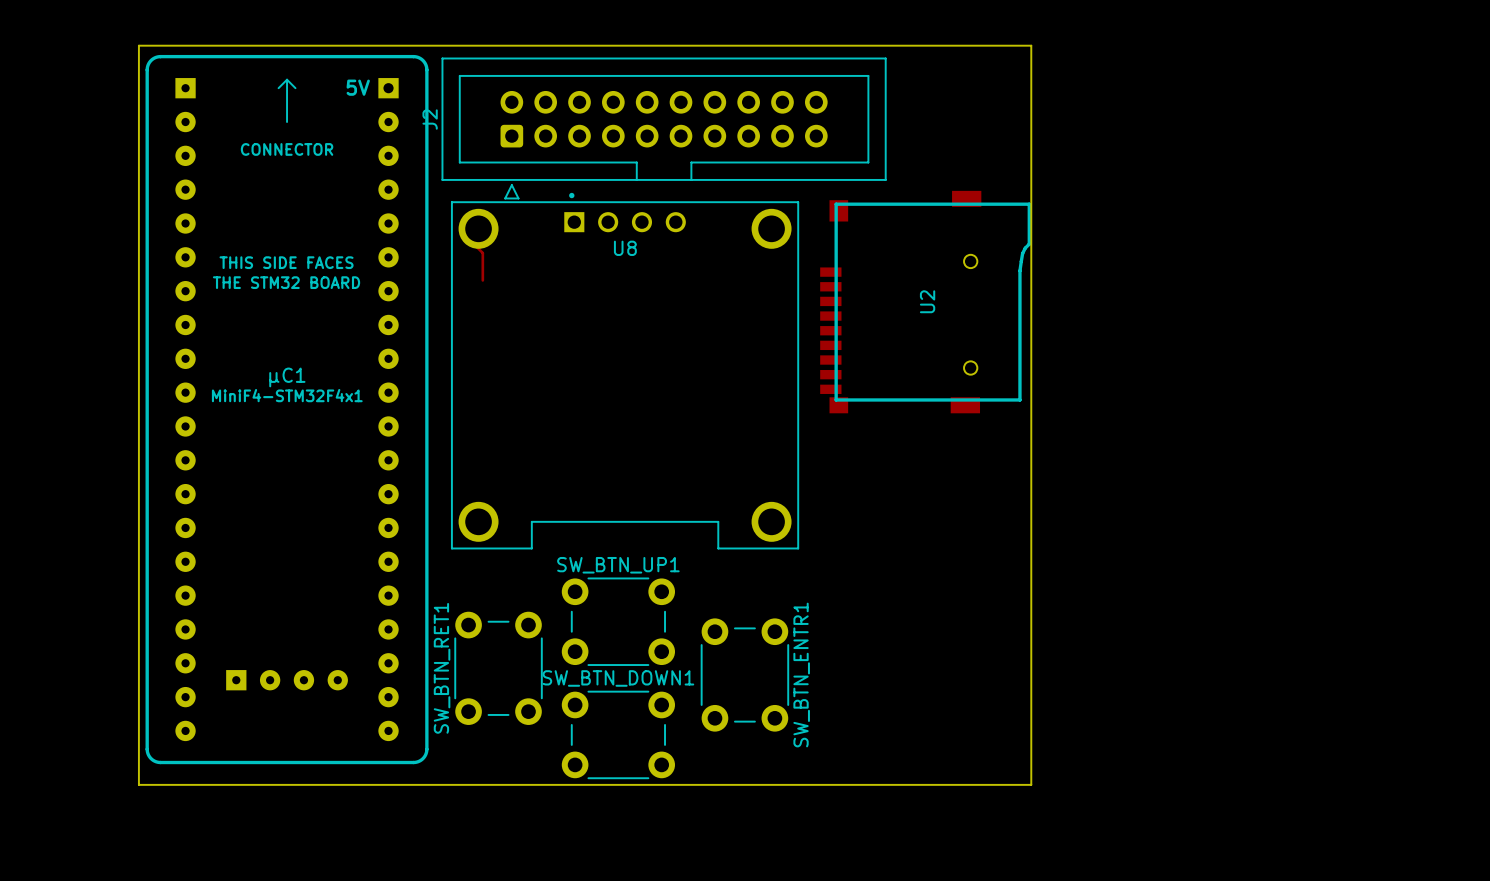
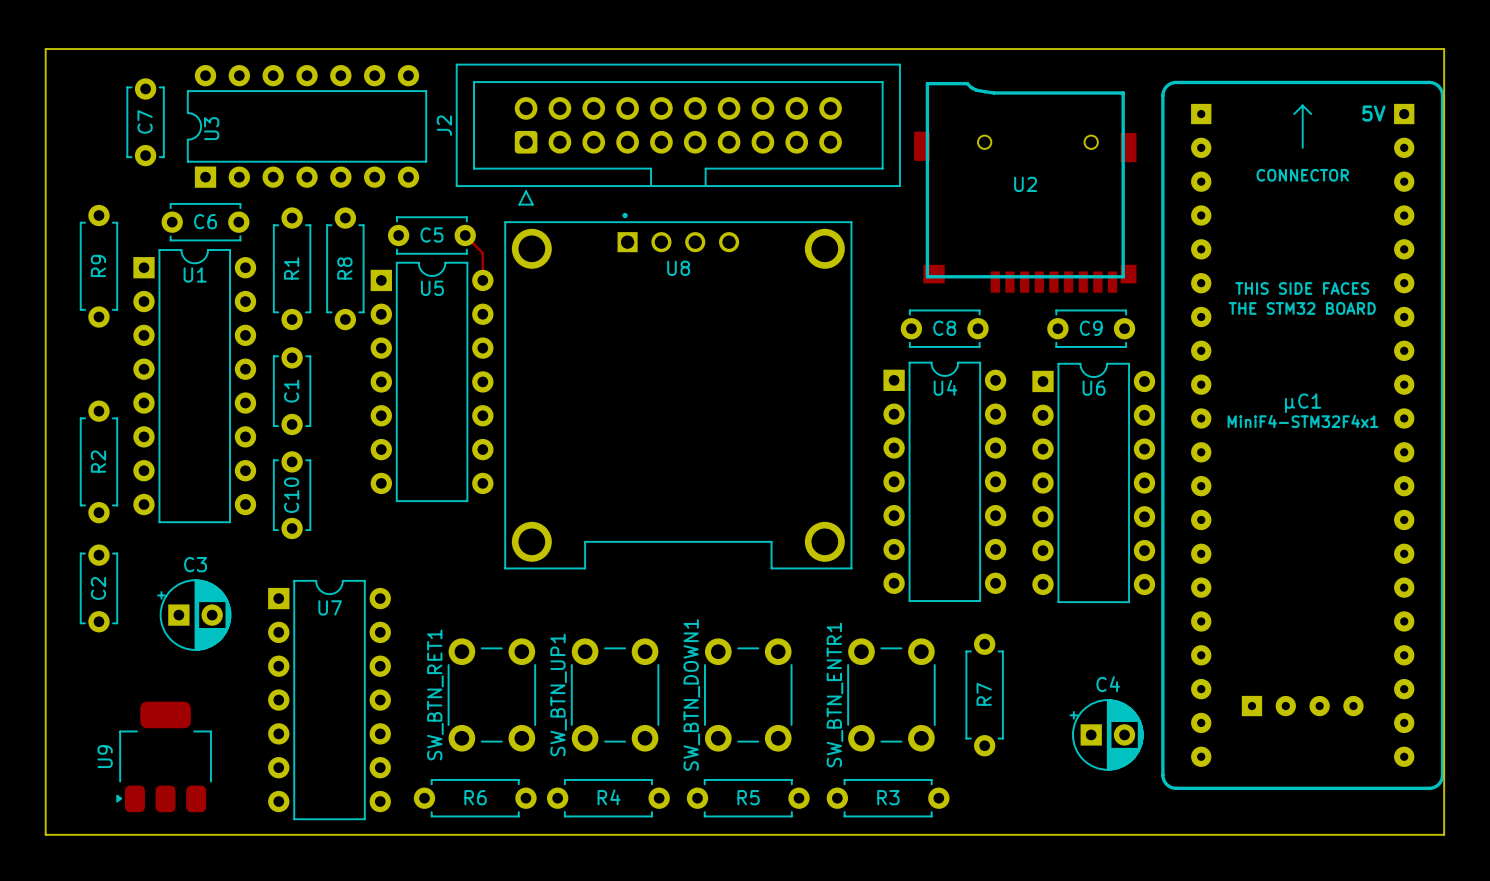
board edge: (138, 45) (1031, 45) (1031, 784) (138, 784) (138, 45) -> (45, 49) (45, 834) (1444, 834) (1444, 49) (45, 49)
C7: none -> (145, 122)
U3: none -> (307, 126)
J2 position: (664, 128) -> (678, 134)
C6: none -> (205, 222)
C5: none -> (431, 235)
R9: none -> (98, 266)
R1: none -> (292, 268)
R8: none -> (345, 268)
U2 rotation: 0° (925, 302) -> 90° counterclockwise (1025, 187)
U2 position: (925, 302) -> (1025, 187)
C8: none -> (944, 328)
C9: none -> (1091, 328)
U8 position: (625, 371) -> (678, 391)
U5: none -> (432, 381)
U1: none -> (194, 386)
C1: none -> (292, 391)
μC1 position: (287, 409) -> (1302, 435)
R2: none -> (98, 461)
U4: none -> (944, 481)
U6: none -> (1093, 482)
C10: none -> (292, 495)
SW_BTN_UP1 name position: SW_BTN_UP1 (618, 565) -> SW_BTN_UP1 (558, 694)
C2: none -> (98, 588)
C3: none -> (194, 615)
SW_BTN_UP1 rotation: 0° (618, 621) -> 90° clockwise (615, 694)
SW_BTN_UP1 position: (618, 621) -> (615, 694)
SW_BTN_RET1 position: (498, 668) -> (491, 694)
SW_BTN_ENTR1 position: (744, 675) -> (891, 694)
SW_BTN_ENTR1 name position: SW_BTN_ENTR1 (801, 675) -> SW_BTN_ENTR1 (834, 694)
SW_BTN_DOWN1 name position: SW_BTN_DOWN1 (618, 678) -> SW_BTN_DOWN1 (691, 694)
R7: none -> (984, 694)
U7: none -> (329, 700)
SW_BTN_DOWN1 rotation: 0° (618, 734) -> 90° clockwise (748, 694)
SW_BTN_DOWN1 position: (618, 734) -> (748, 694)
C4: none -> (1106, 734)
U9: none -> (164, 756)
R6: none -> (475, 798)
R4: none -> (608, 798)
R5: none -> (748, 798)
R3: none -> (888, 798)

